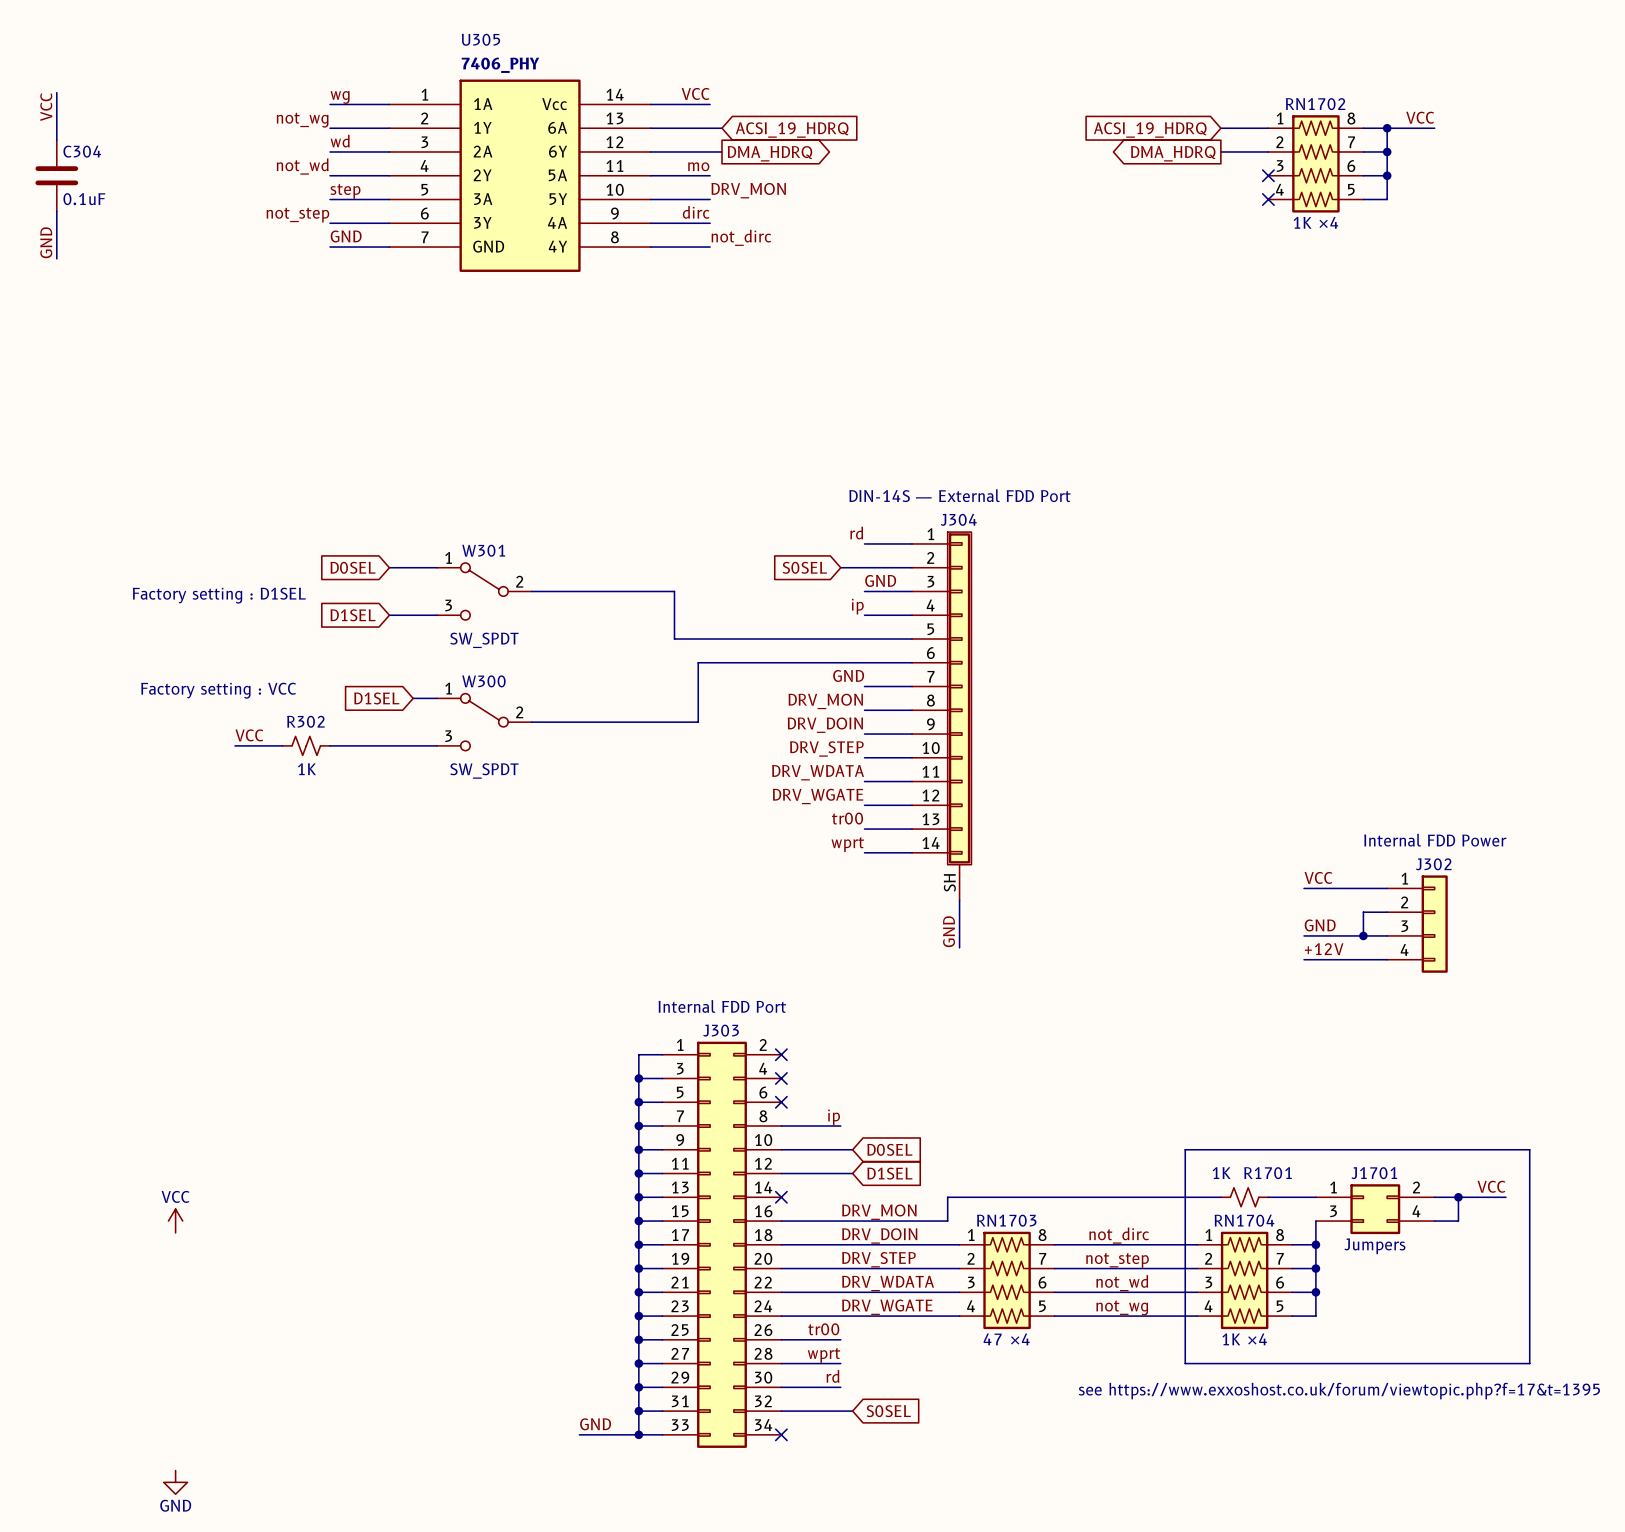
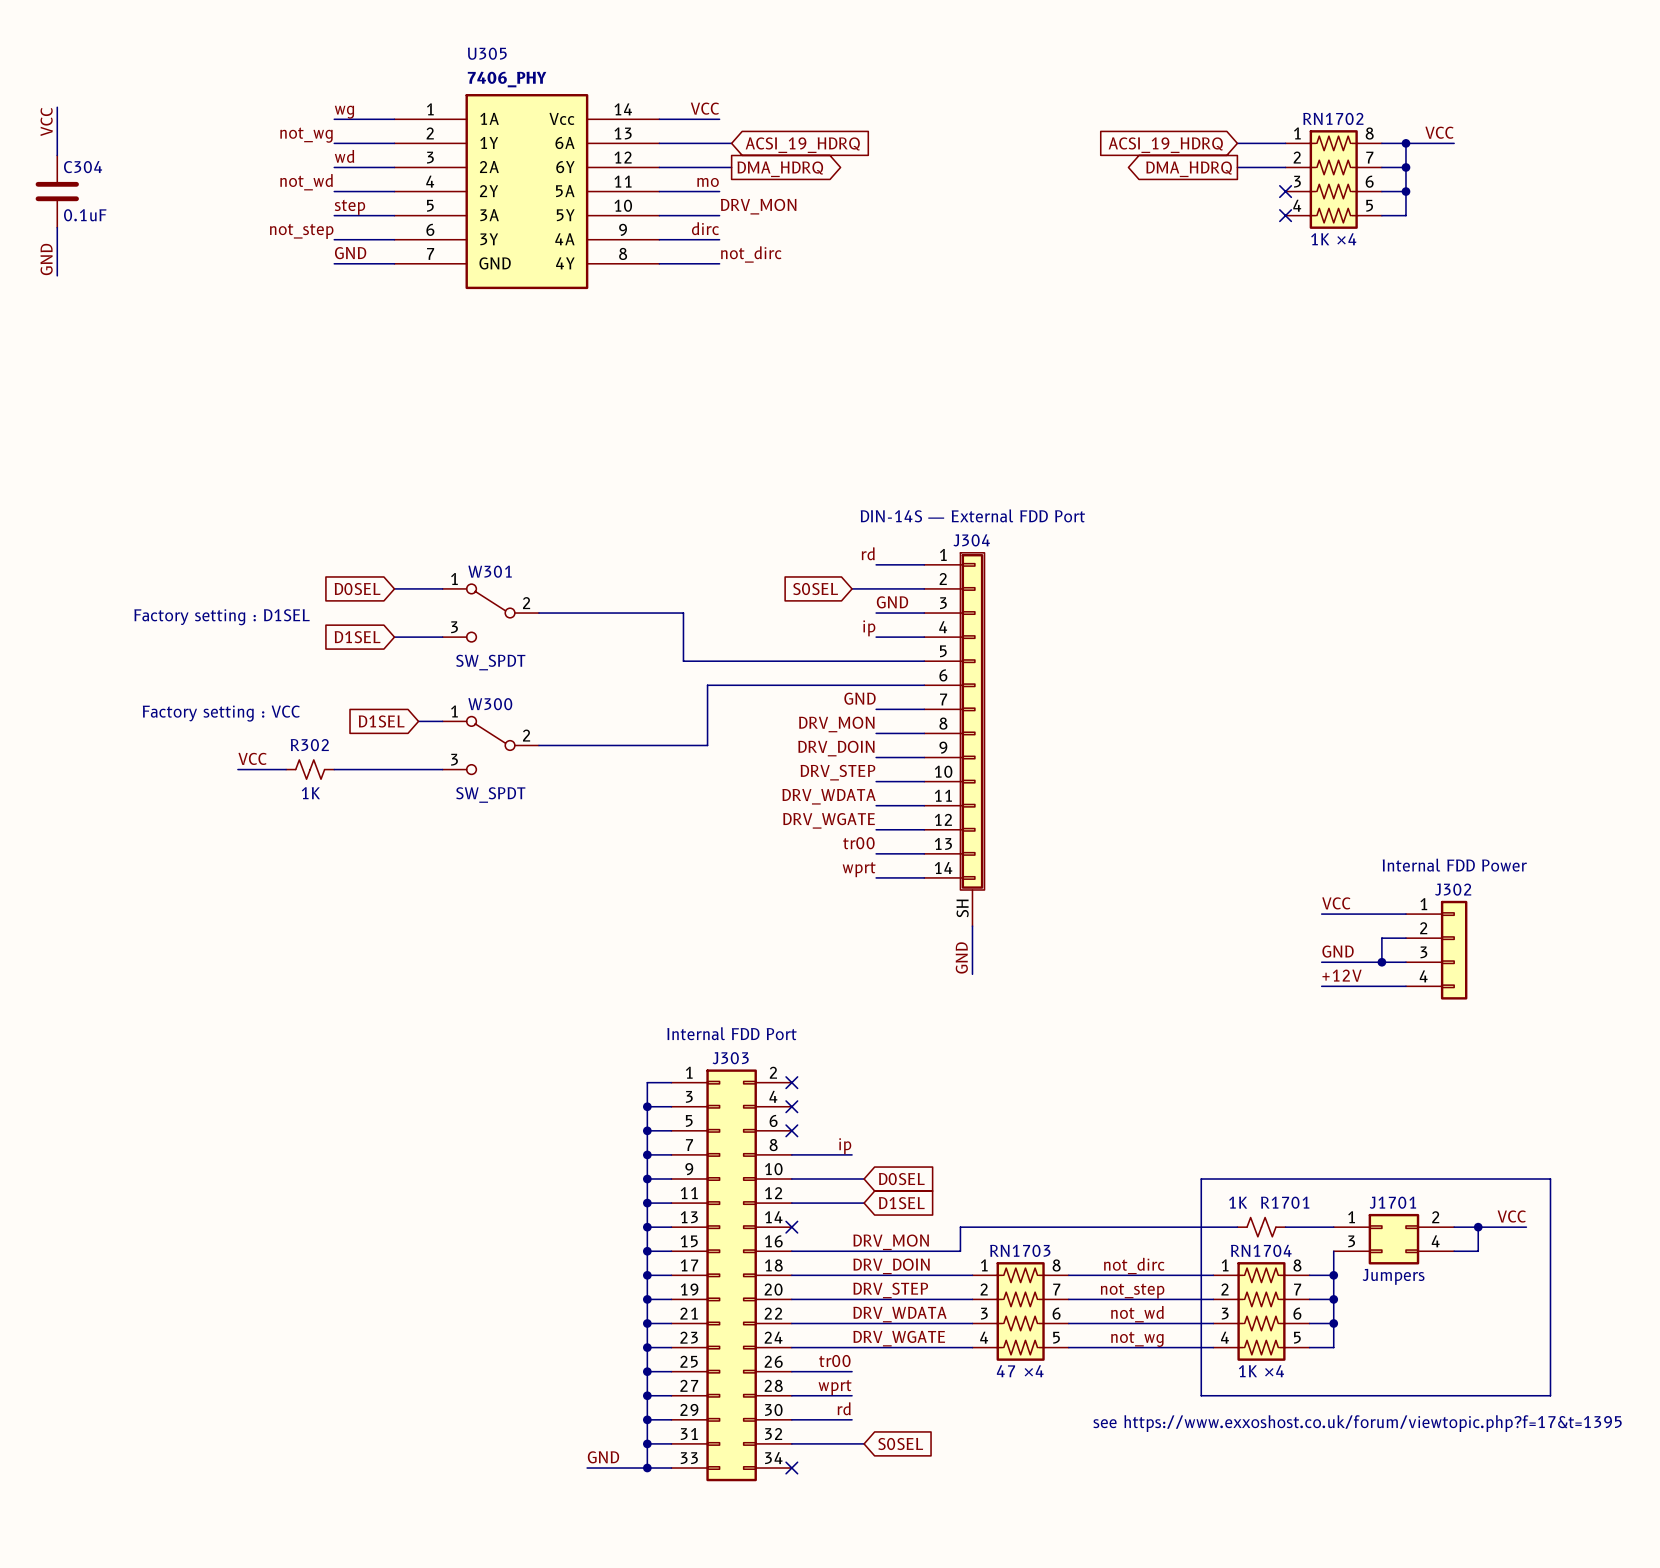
power symbol: VCC (175, 1221) -> none
power symbol: GND (175, 1482) -> none

